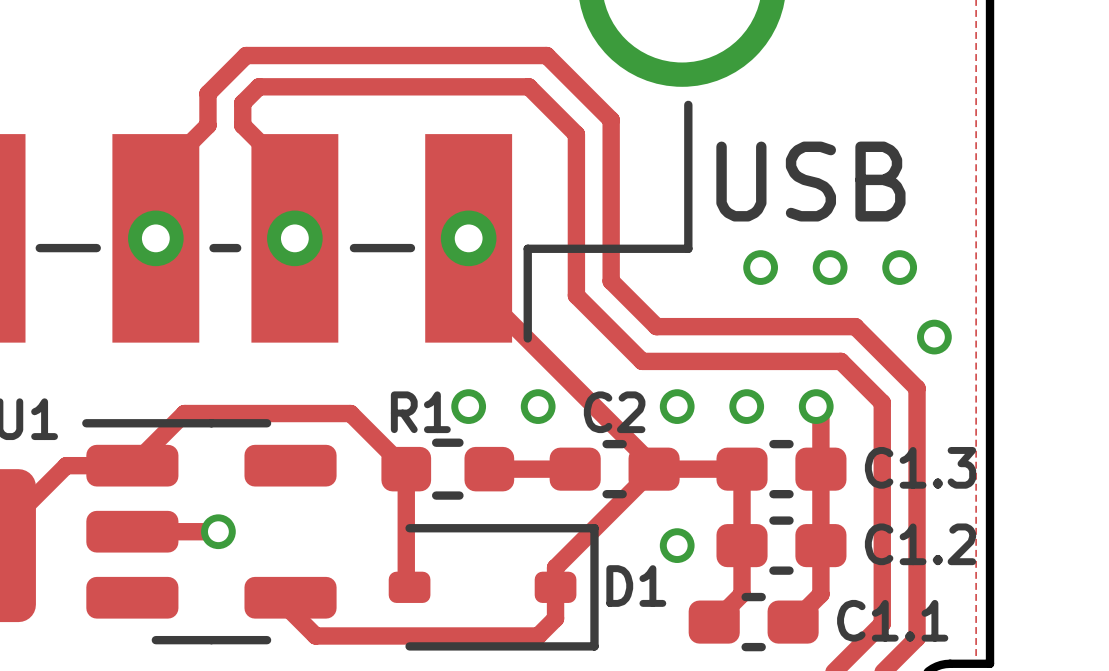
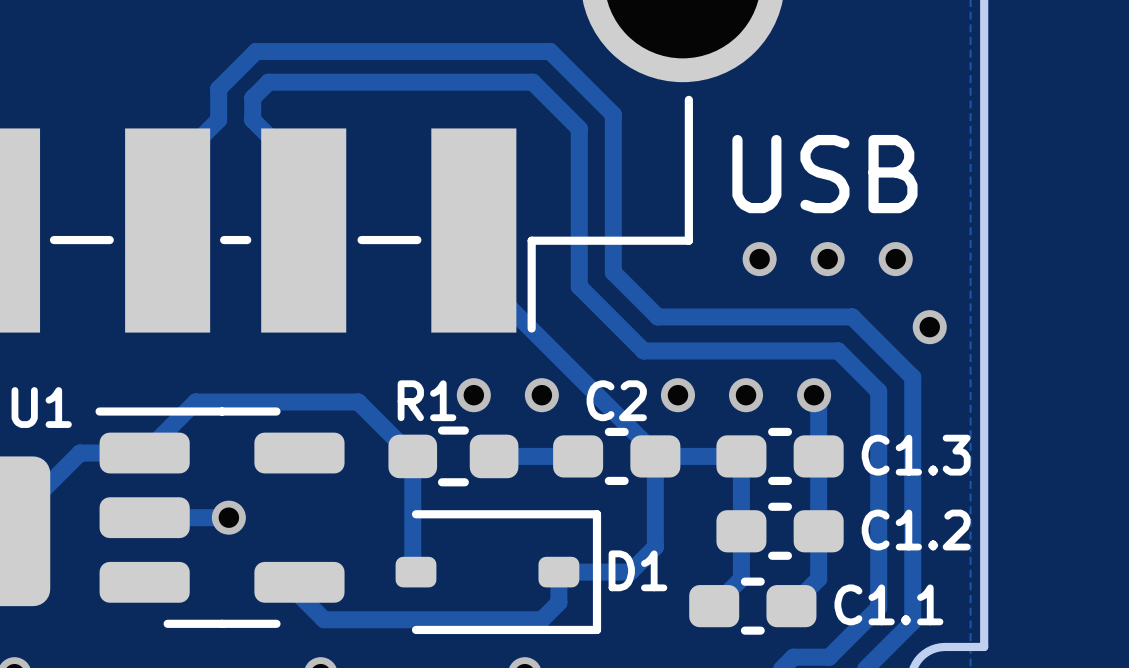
USB name: none -> USB (824, 174)
USB text: USB (810, 181) -> none
via: (155, 238) -> none
via: (294, 238) -> none
via: (468, 238) -> none
track: (654, 469) (555, 567) (555, 587) -> (655, 456) (655, 547) (630, 572) (558, 572)
via: (677, 545) -> none

